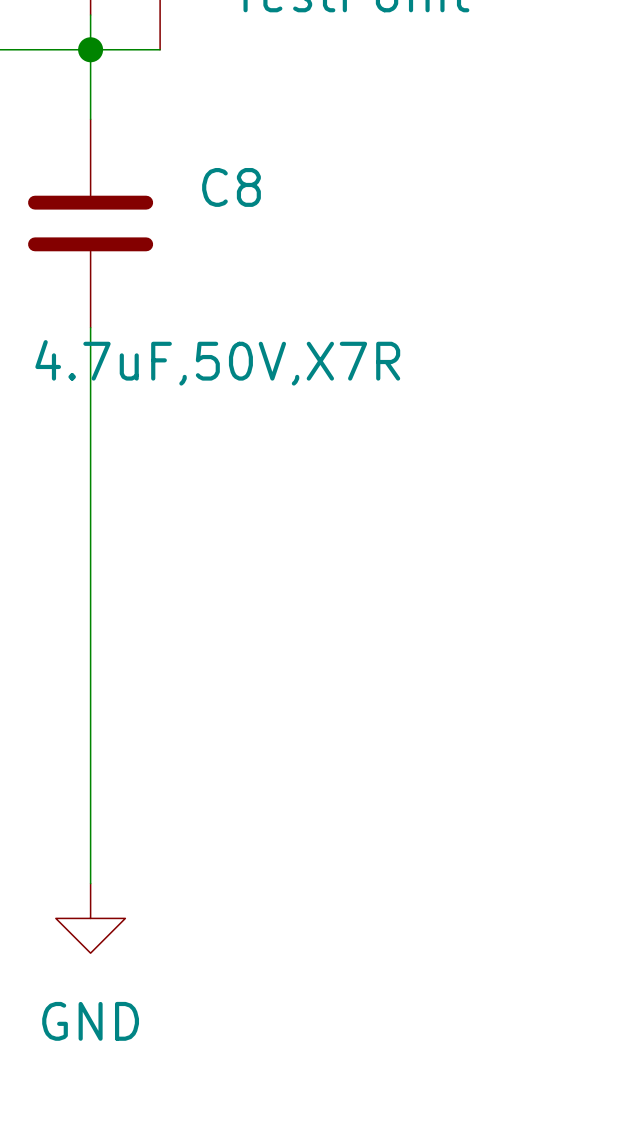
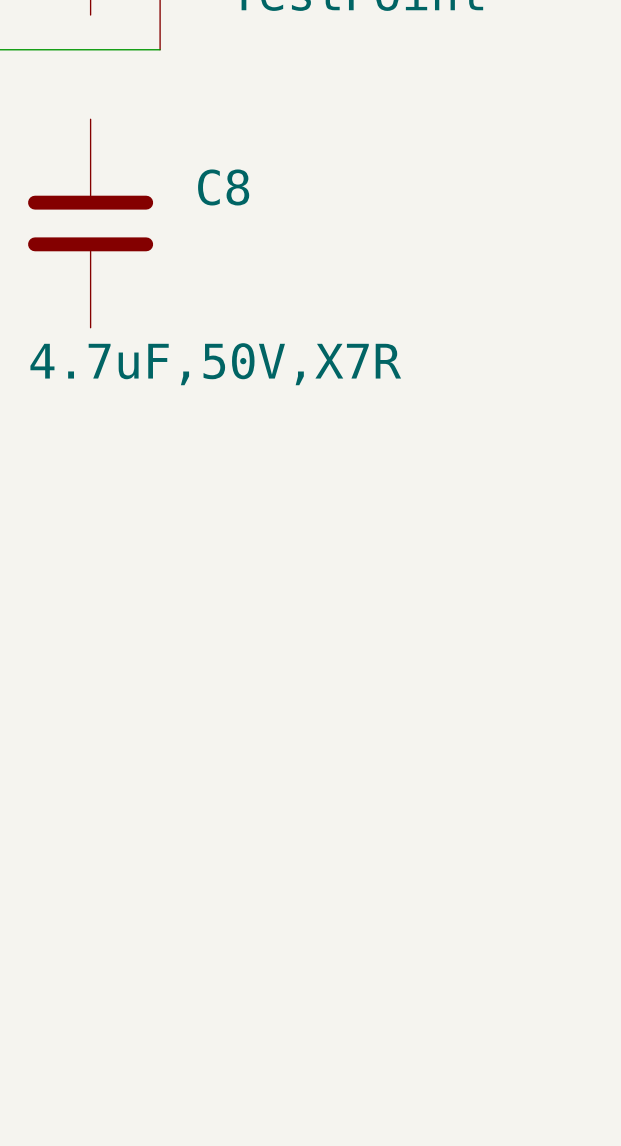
wire: (90, 15) (90, 119) -> none
junction: (90, 49) -> none
wire: (90, 327) (90, 883) -> none
power symbol: GND (90, 918) -> none

